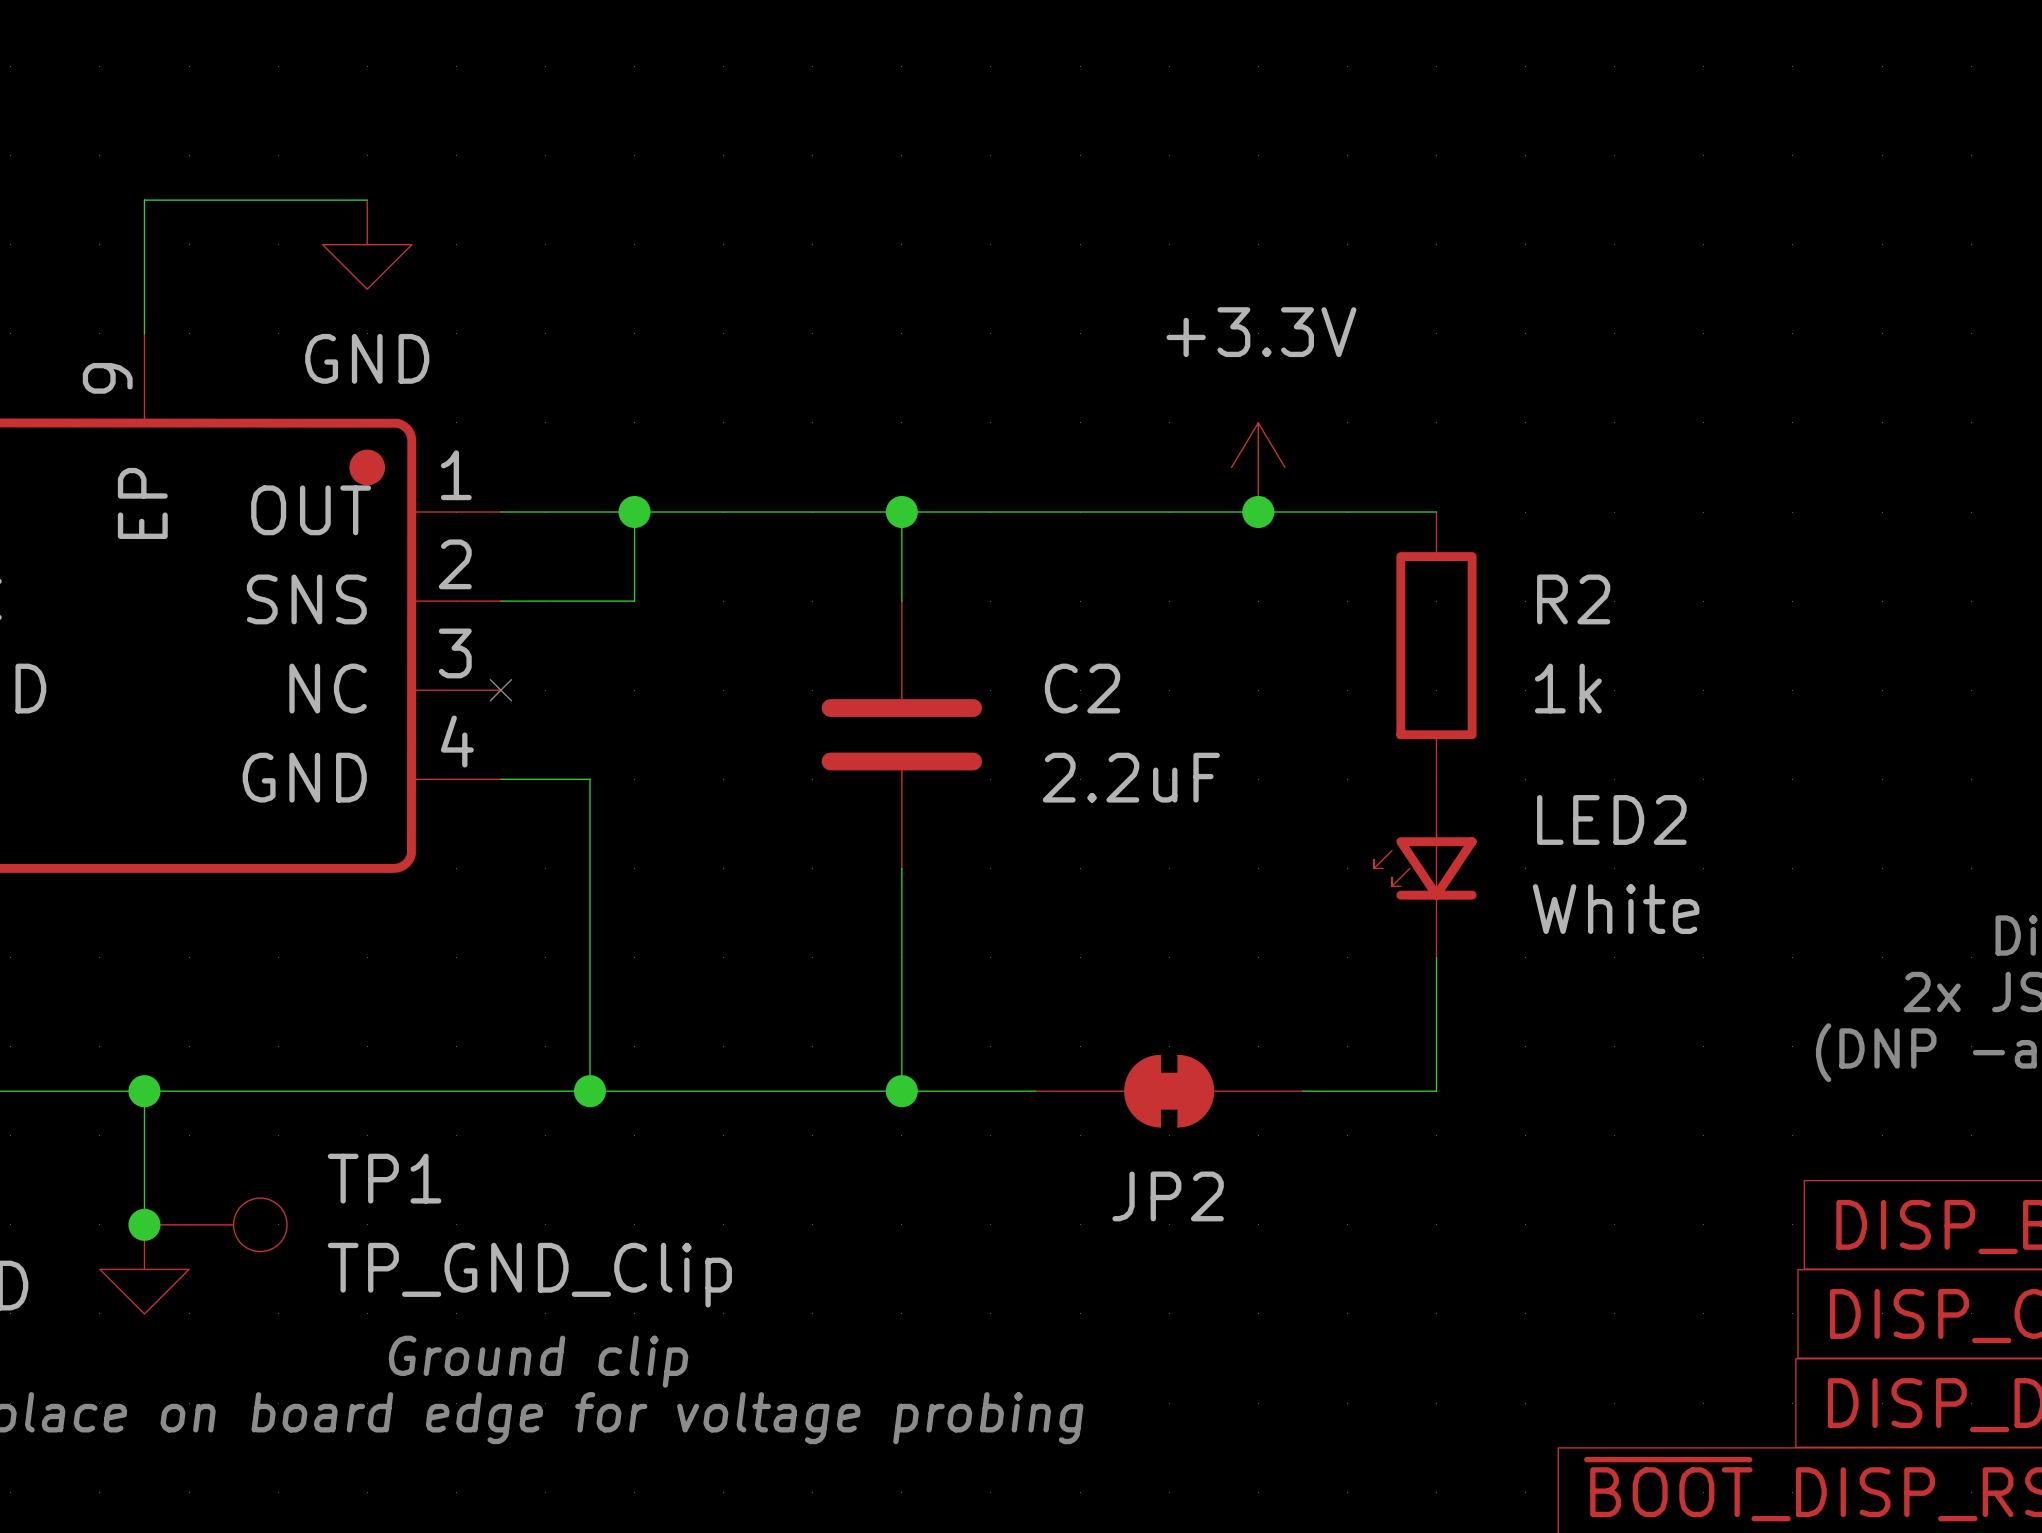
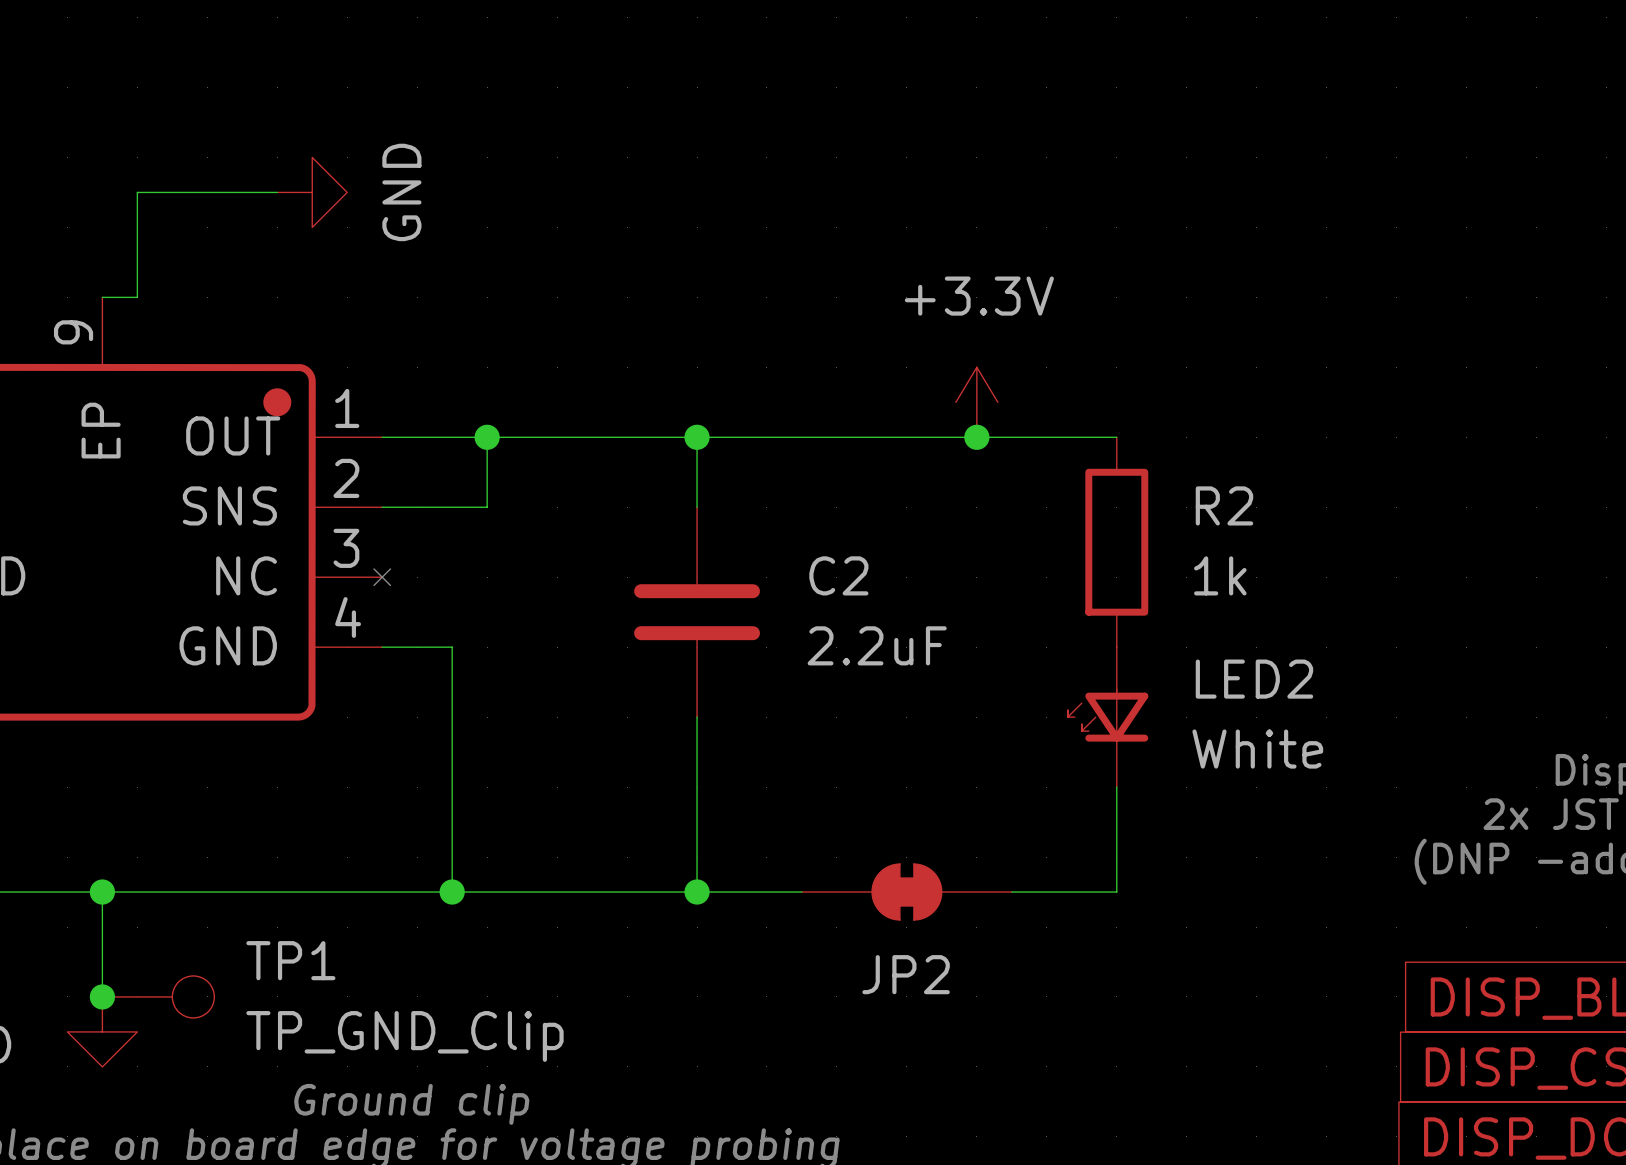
wire: (189, 200) (144, 200) (144, 333) -> (137, 192) (137, 297) (102, 297)
power symbol rotation: 0° (367, 244) -> 90° counterclockwise (312, 192)
power symbol position: GND (367, 244) -> GND (312, 192)

